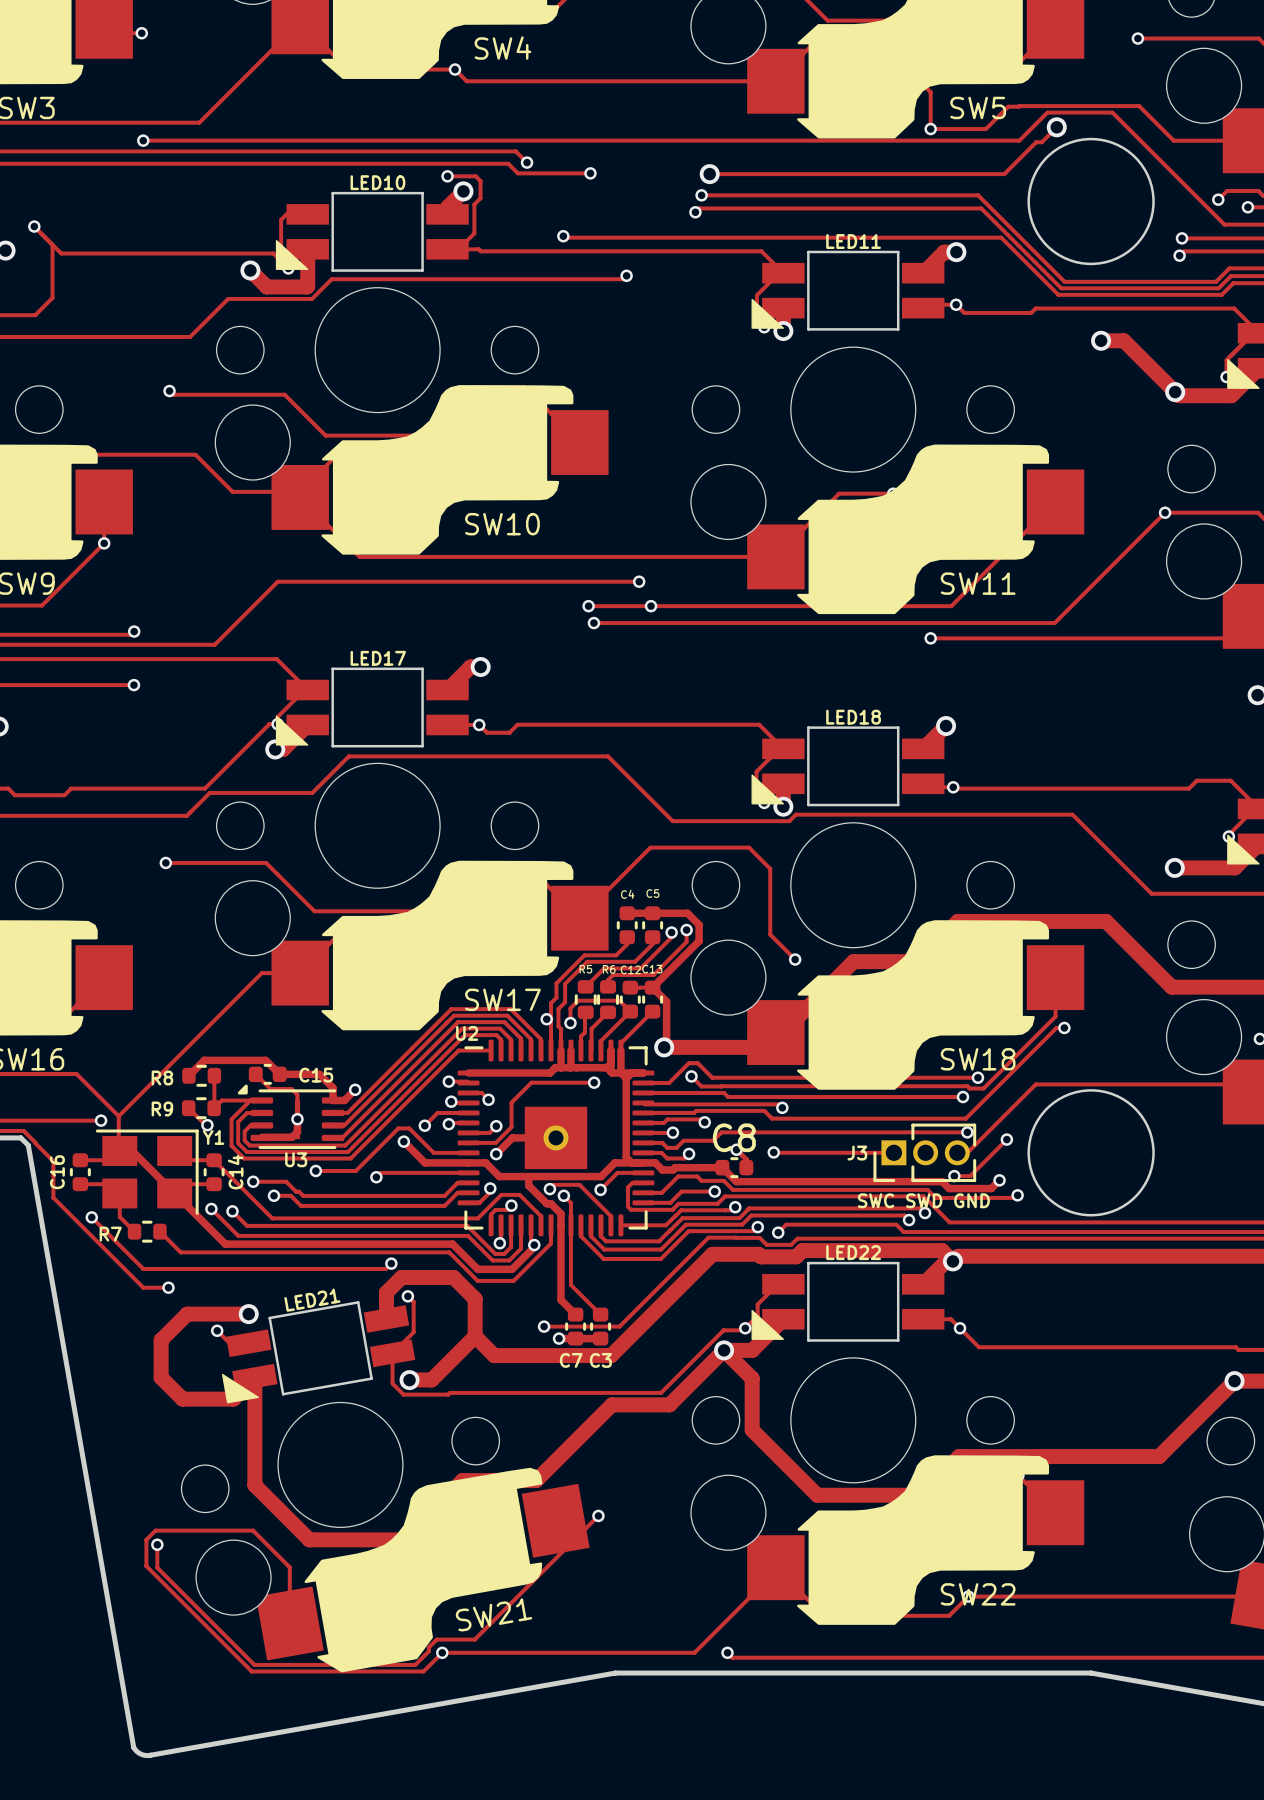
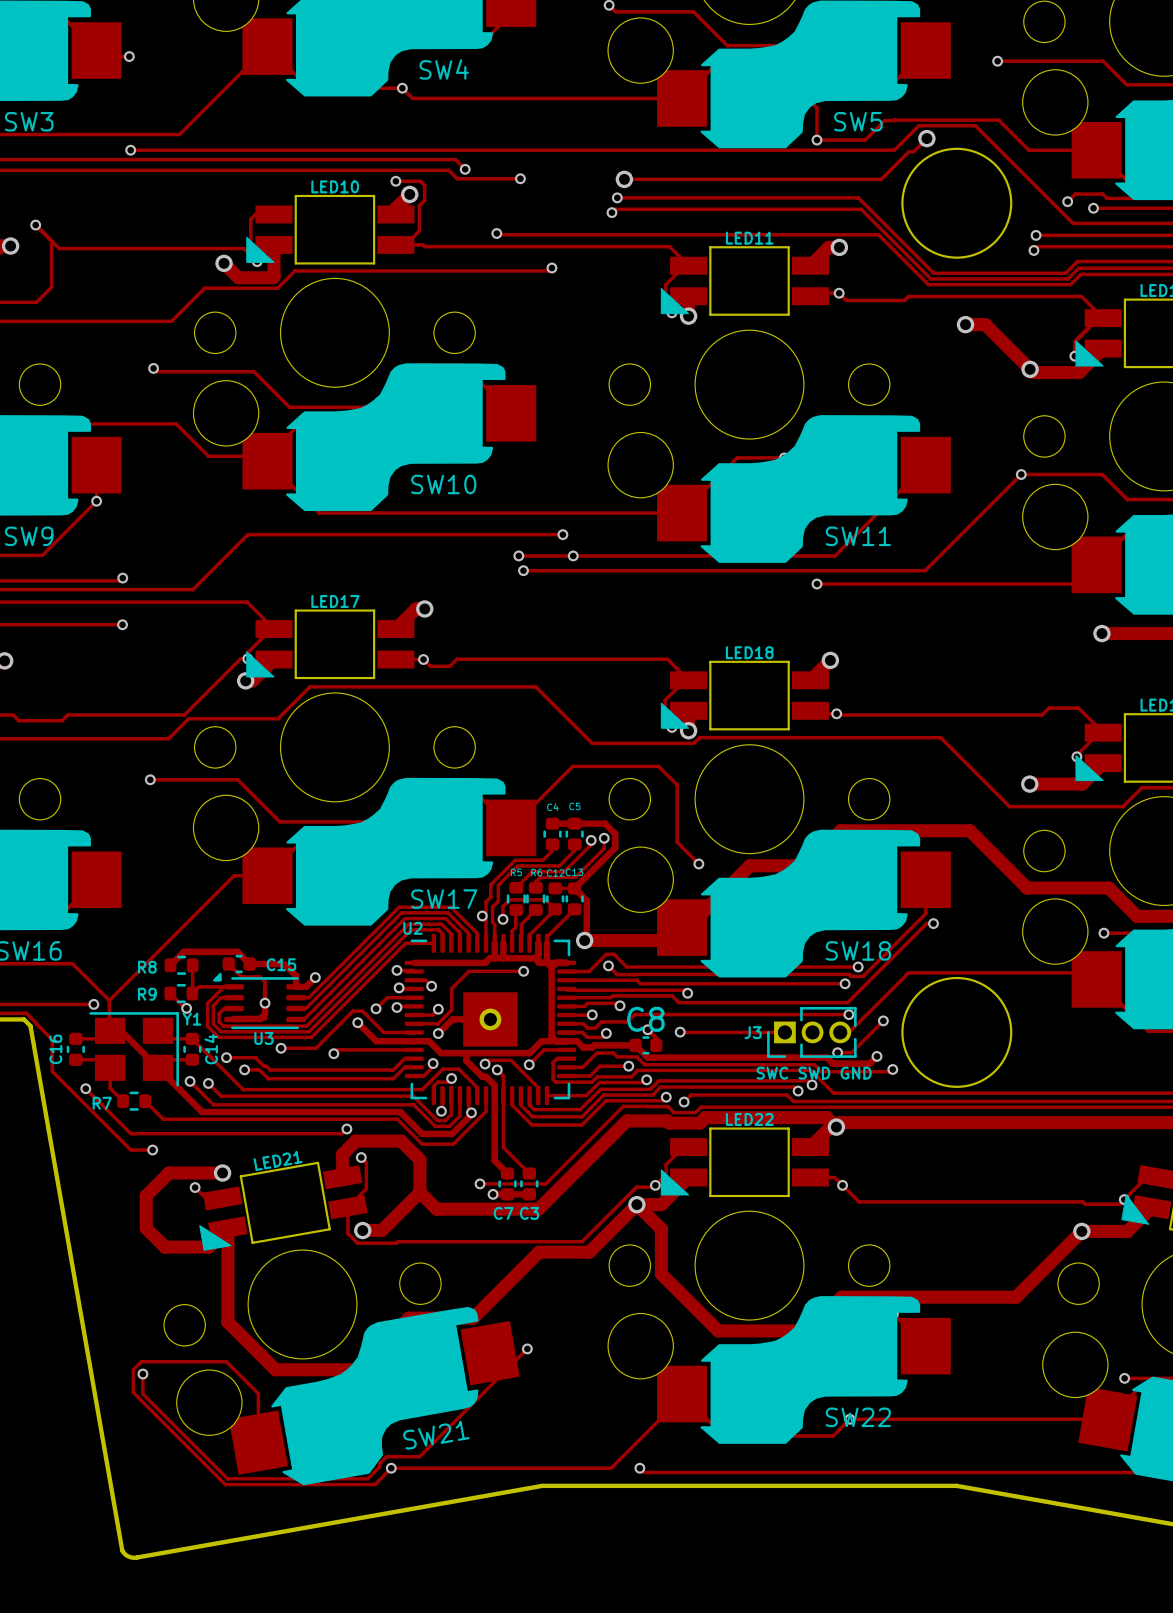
J3 value: none -> SWC SWD GND (814, 1073)
text: SWC SWD GND (923, 1200) -> none

